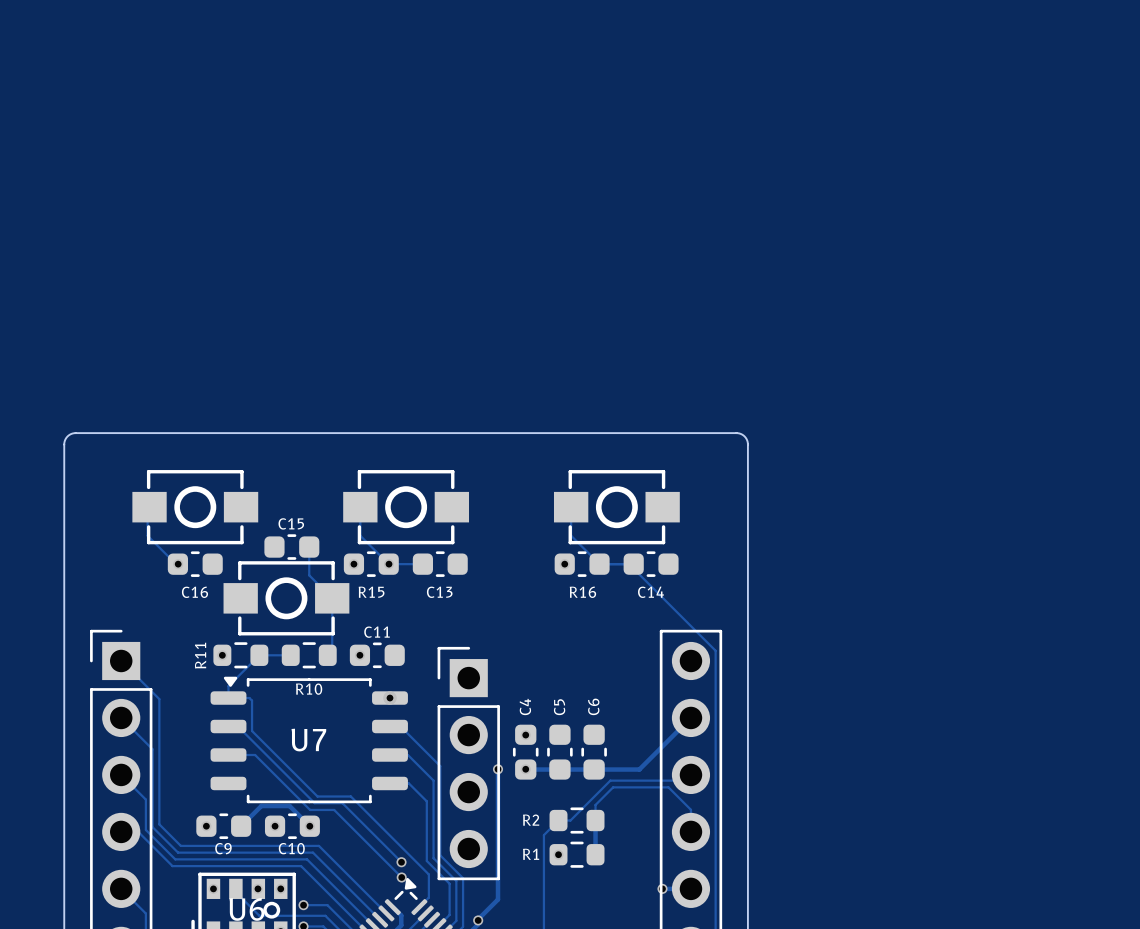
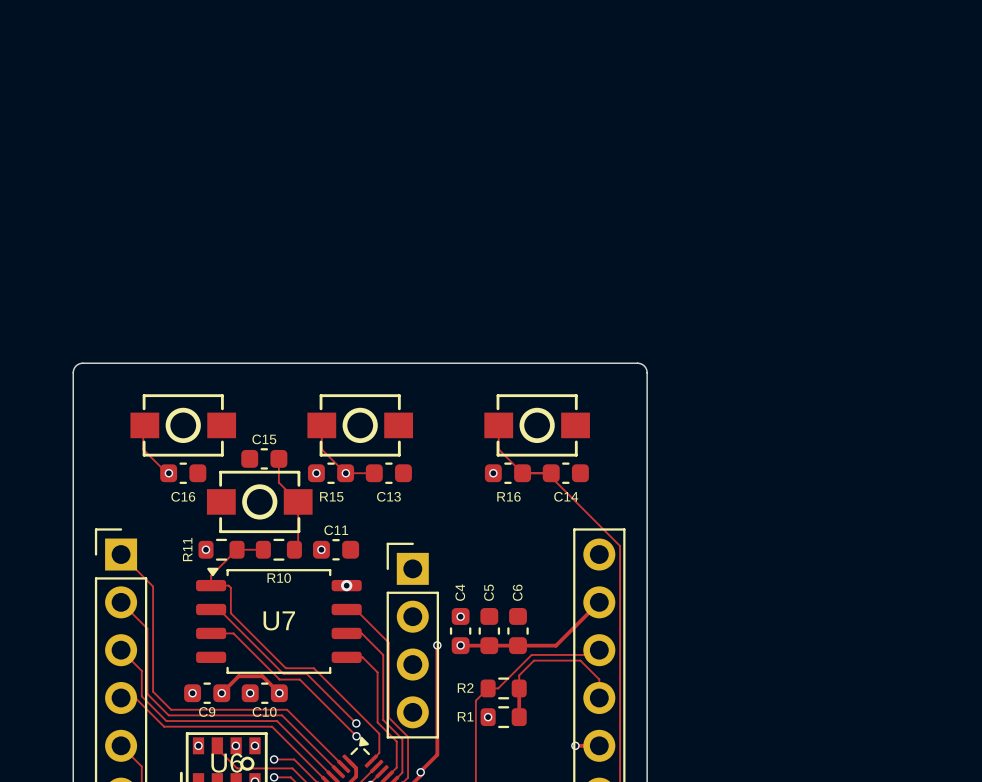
via: none -> (221, 693)

